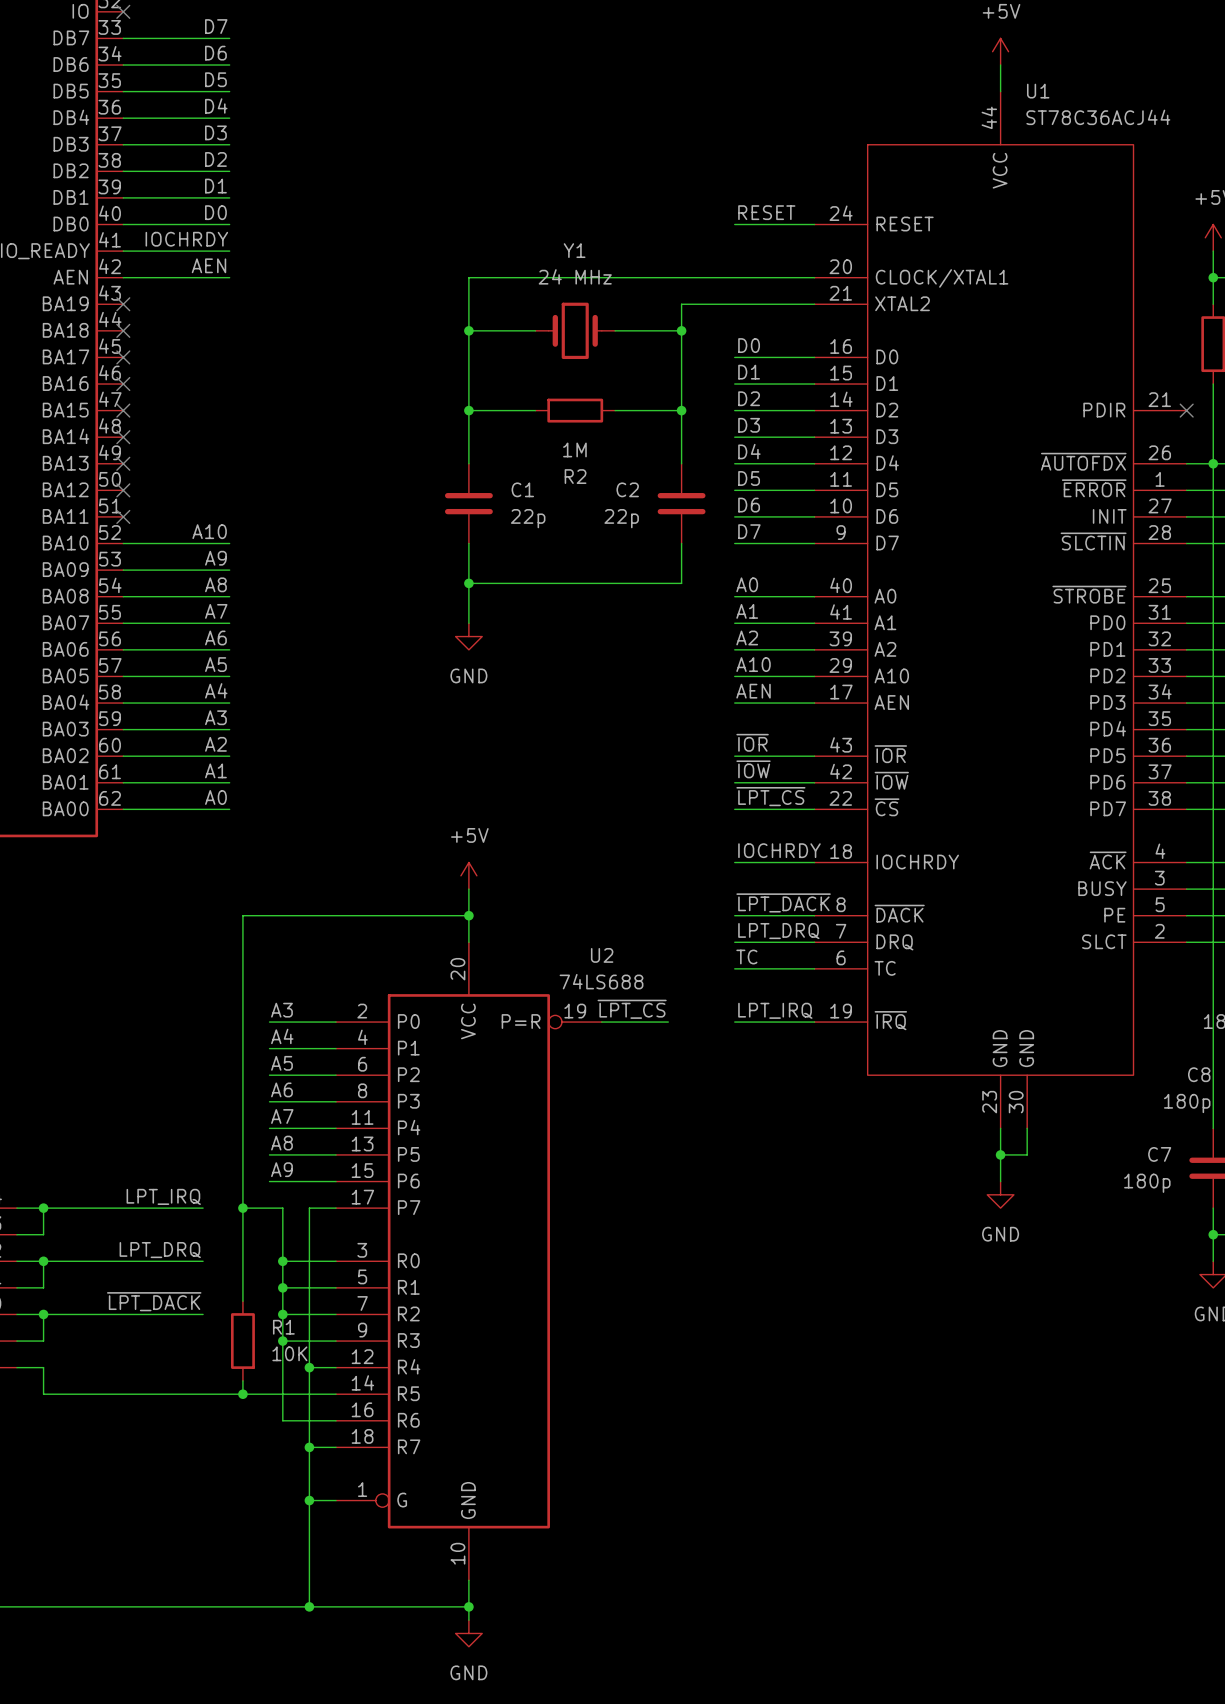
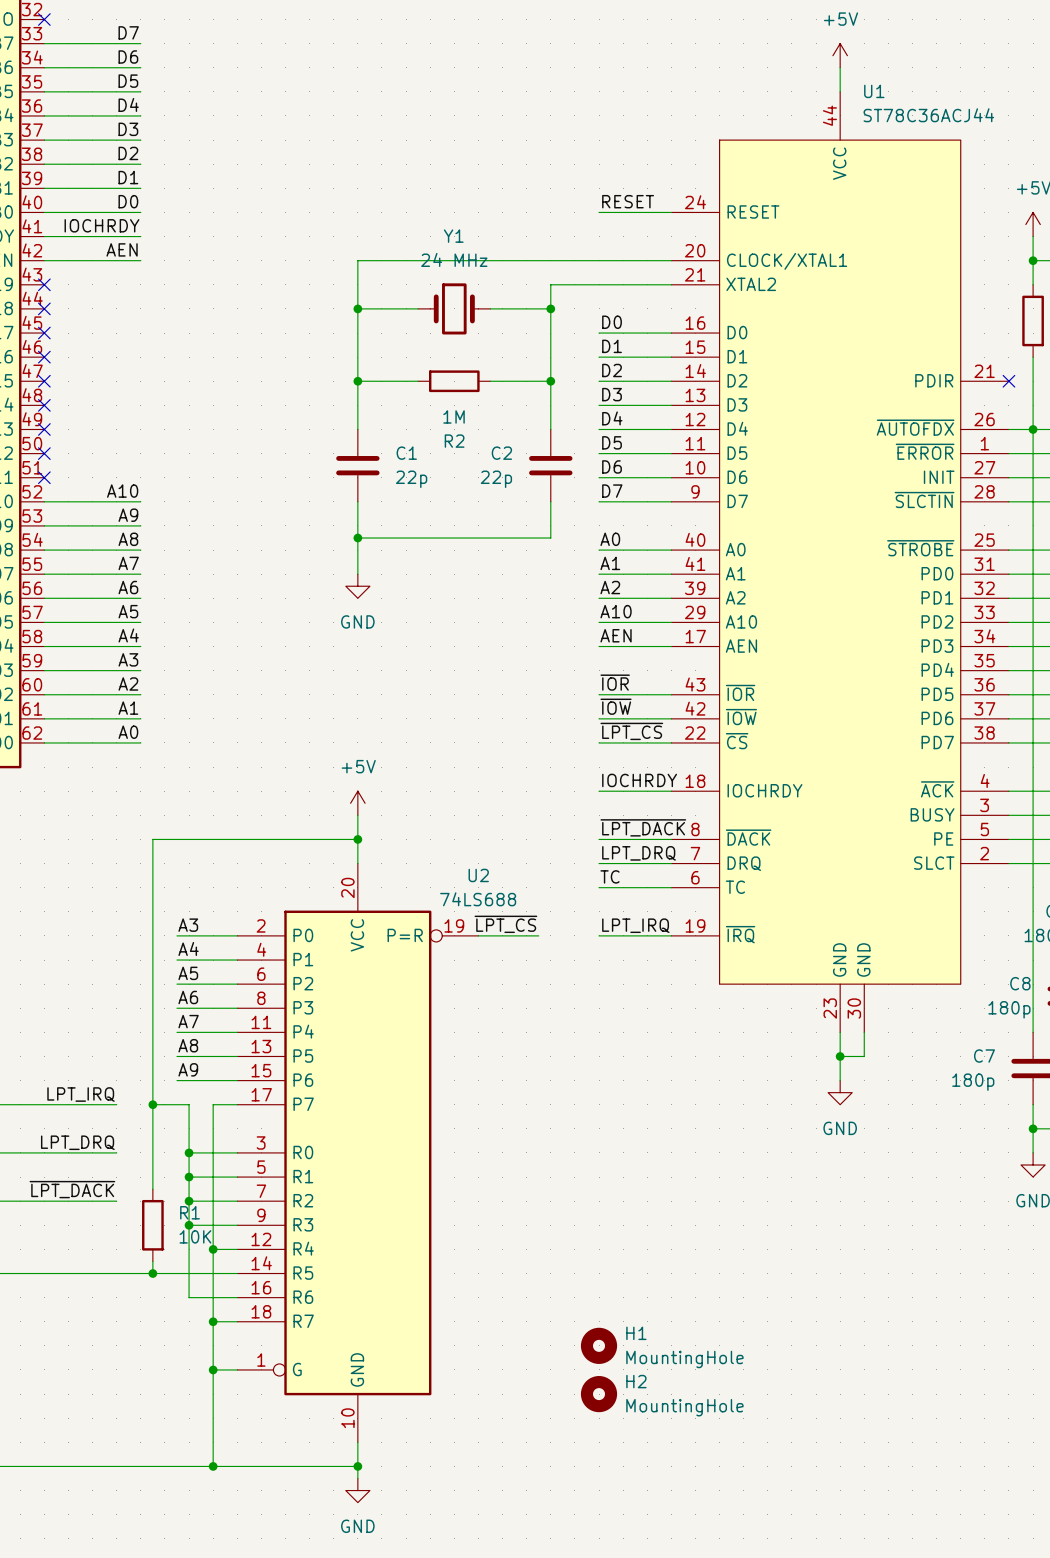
H1: none -> MountingHole (599, 1345)
H2: none -> MountingHole (599, 1394)

